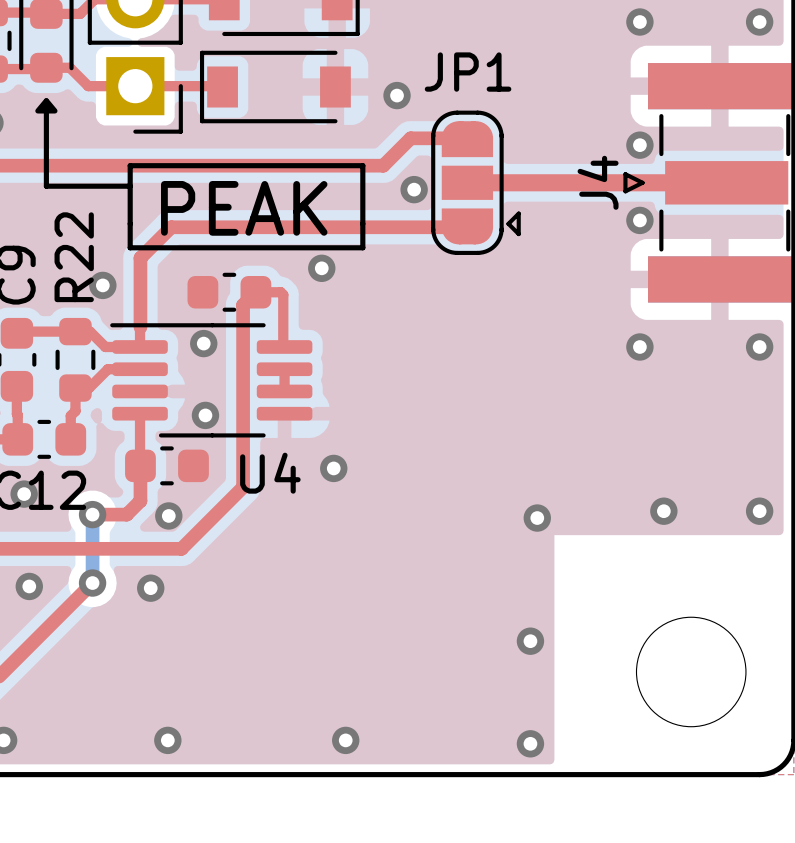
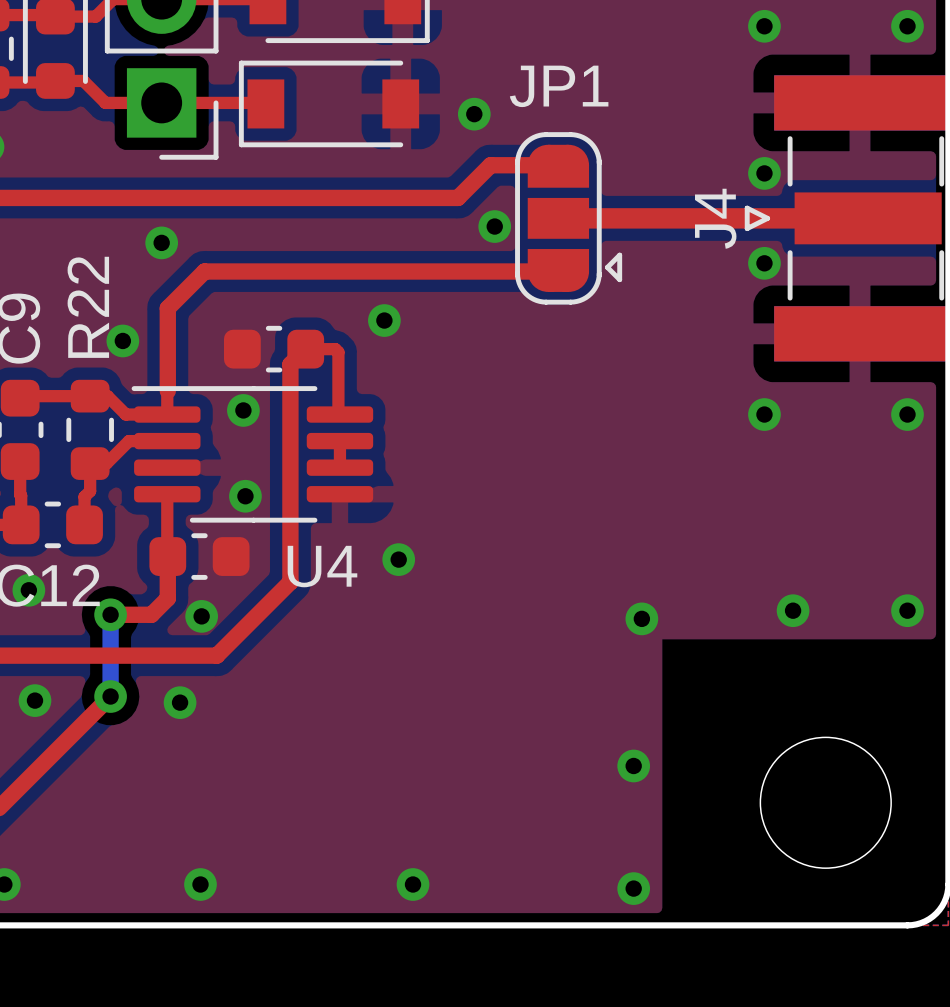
drawing: [35, 98, 58, 114] -> none
line: (46, 100) (46, 186) (130, 186) -> none
line: (130, 165) (130, 247) (362, 247) (362, 165) (130, 165) -> none
via: none -> (161, 242)
text: PEAK (244, 208) -> none

